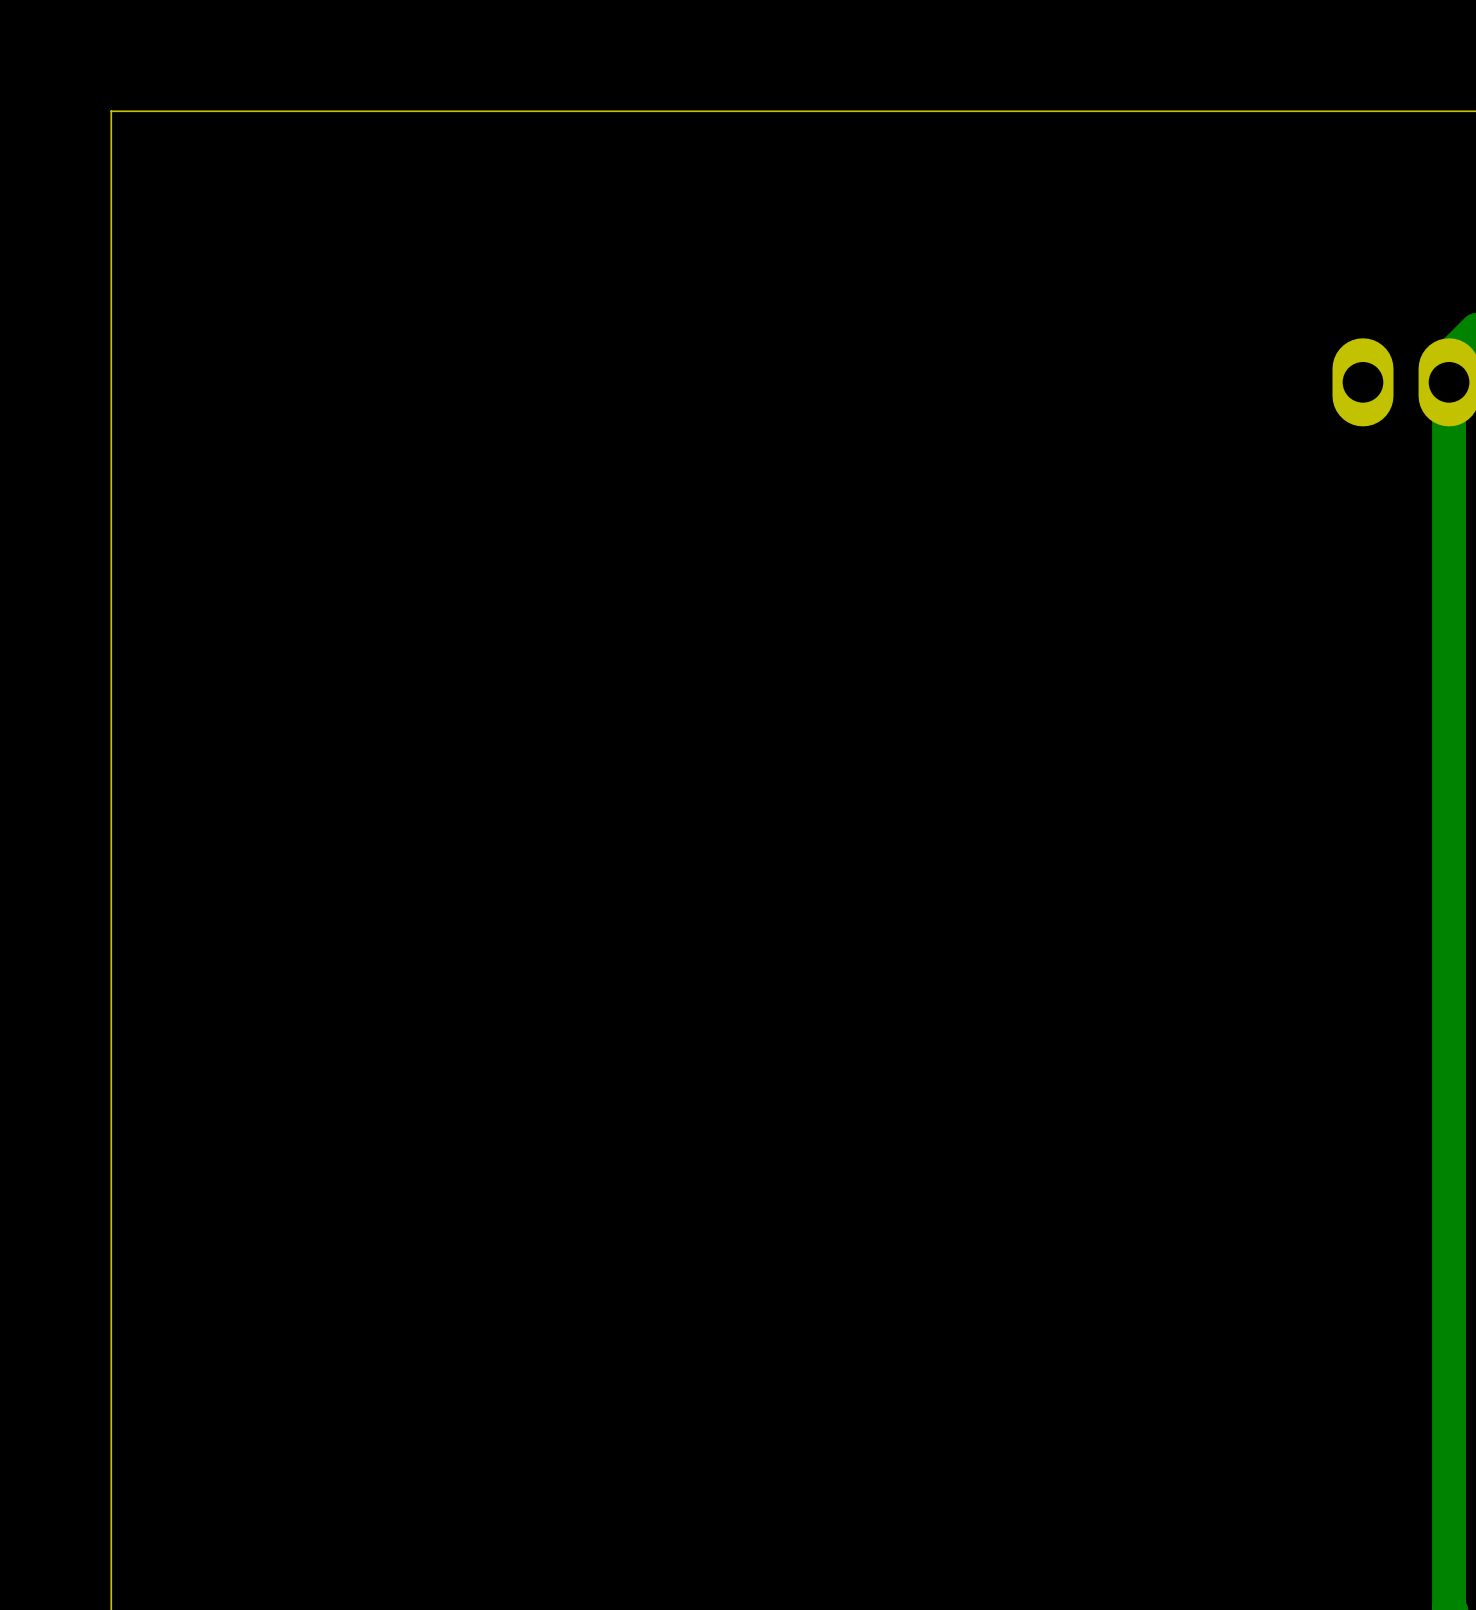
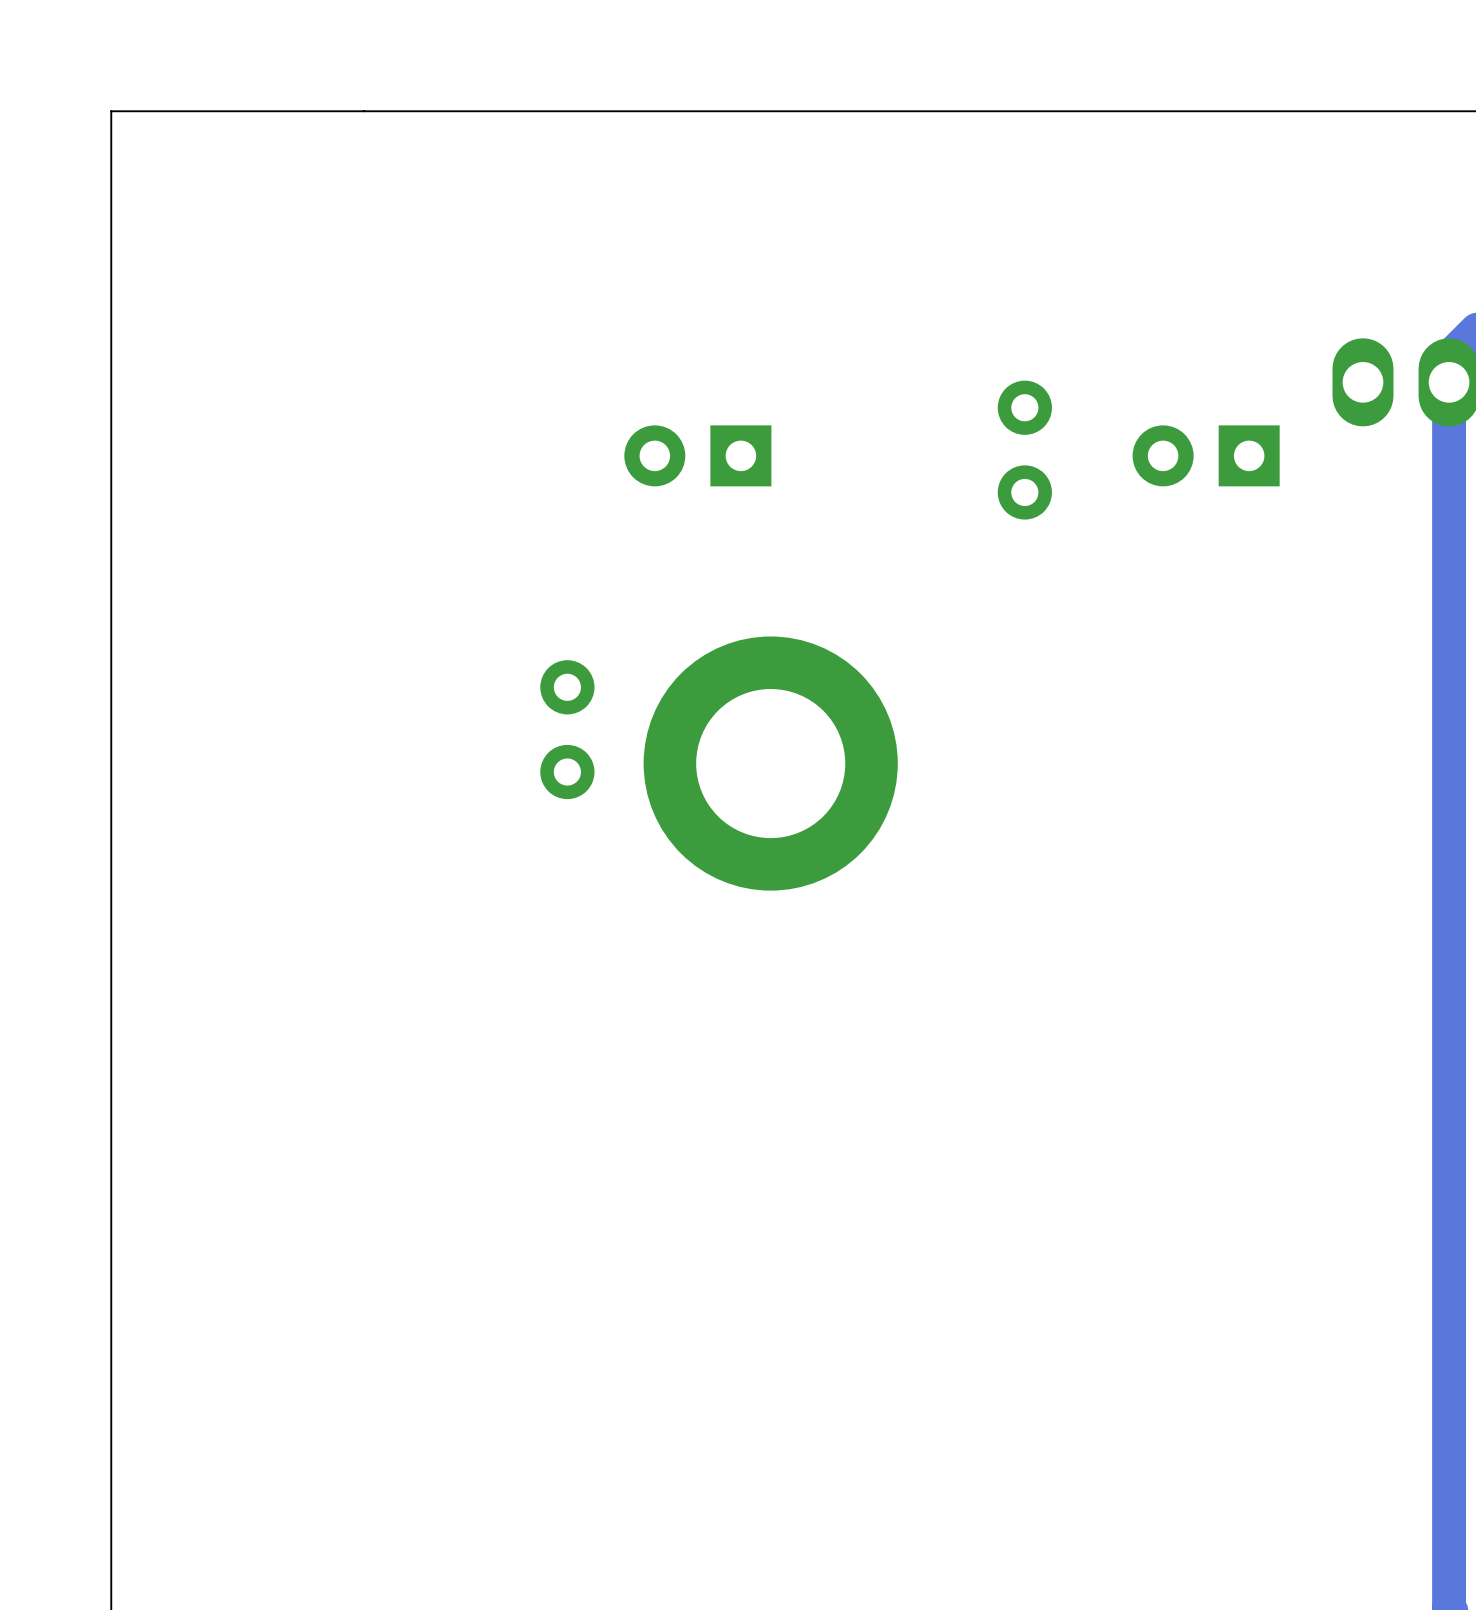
part: none -> (1024, 450)
part: none -> (697, 455)
part: none -> (1206, 455)
part: none -> (567, 729)
part: none -> (770, 763)

